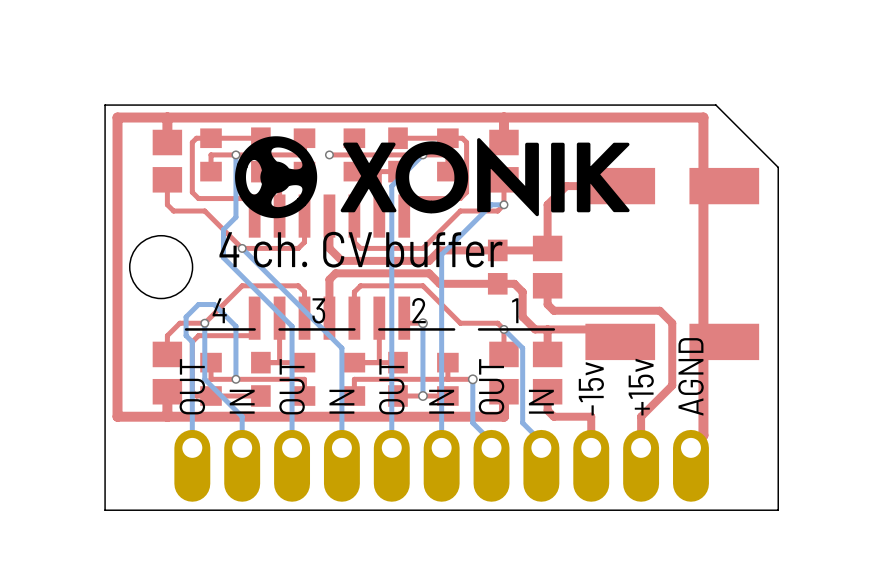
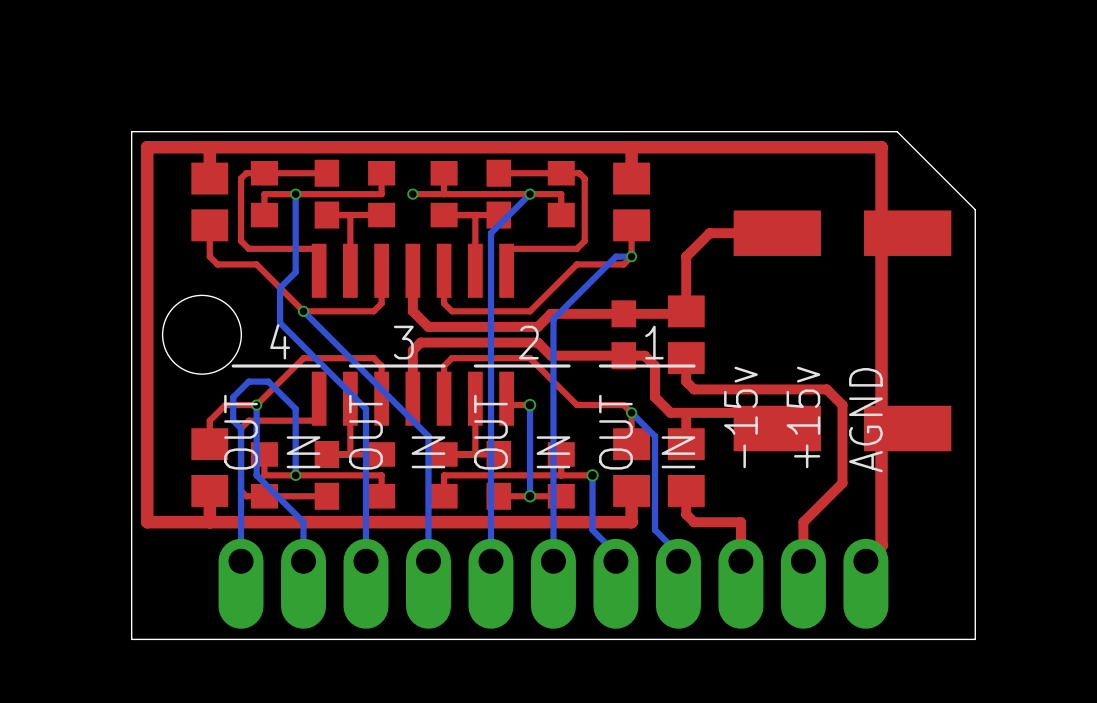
drawing: [235, 136, 318, 219] -> none
drawing: [340, 138, 630, 217] -> none
text: 4 ch. CV buffer (361, 249) -> none
text position: 4 (219, 310) -> 4 (280, 341)
text position: 3 (318, 310) -> 3 (403, 342)
text position: 2 (419, 310) -> 2 (528, 342)
text position: 1 (515, 310) -> 1 (654, 342)
line: (254, 329) (186, 329) -> (319, 366) (233, 366)
line: (354, 329) (279, 329) -> (444, 366) (350, 366)
line: (454, 329) (379, 329) -> (569, 366) (475, 366)
line: (553, 329) (479, 329) -> (694, 366) (600, 366)
text position: AGND (690, 376) -> AGND (865, 420)
text position: OUT (192, 386) -> OUT (241, 432)
text position: OUT (292, 386) -> OUT (366, 432)
text position: OUT (391, 386) -> OUT (490, 432)
text position: OUT (491, 386) -> OUT (615, 432)
text position: +15v (641, 387) -> +15v (803, 417)
text position: -15v (591, 388) -> -15v (740, 417)
text position: IN (242, 401) -> IN (303, 452)
text position: IN (341, 401) -> IN (428, 452)
text position: IN (441, 401) -> IN (553, 452)
text position: IN (541, 401) -> IN (678, 452)

